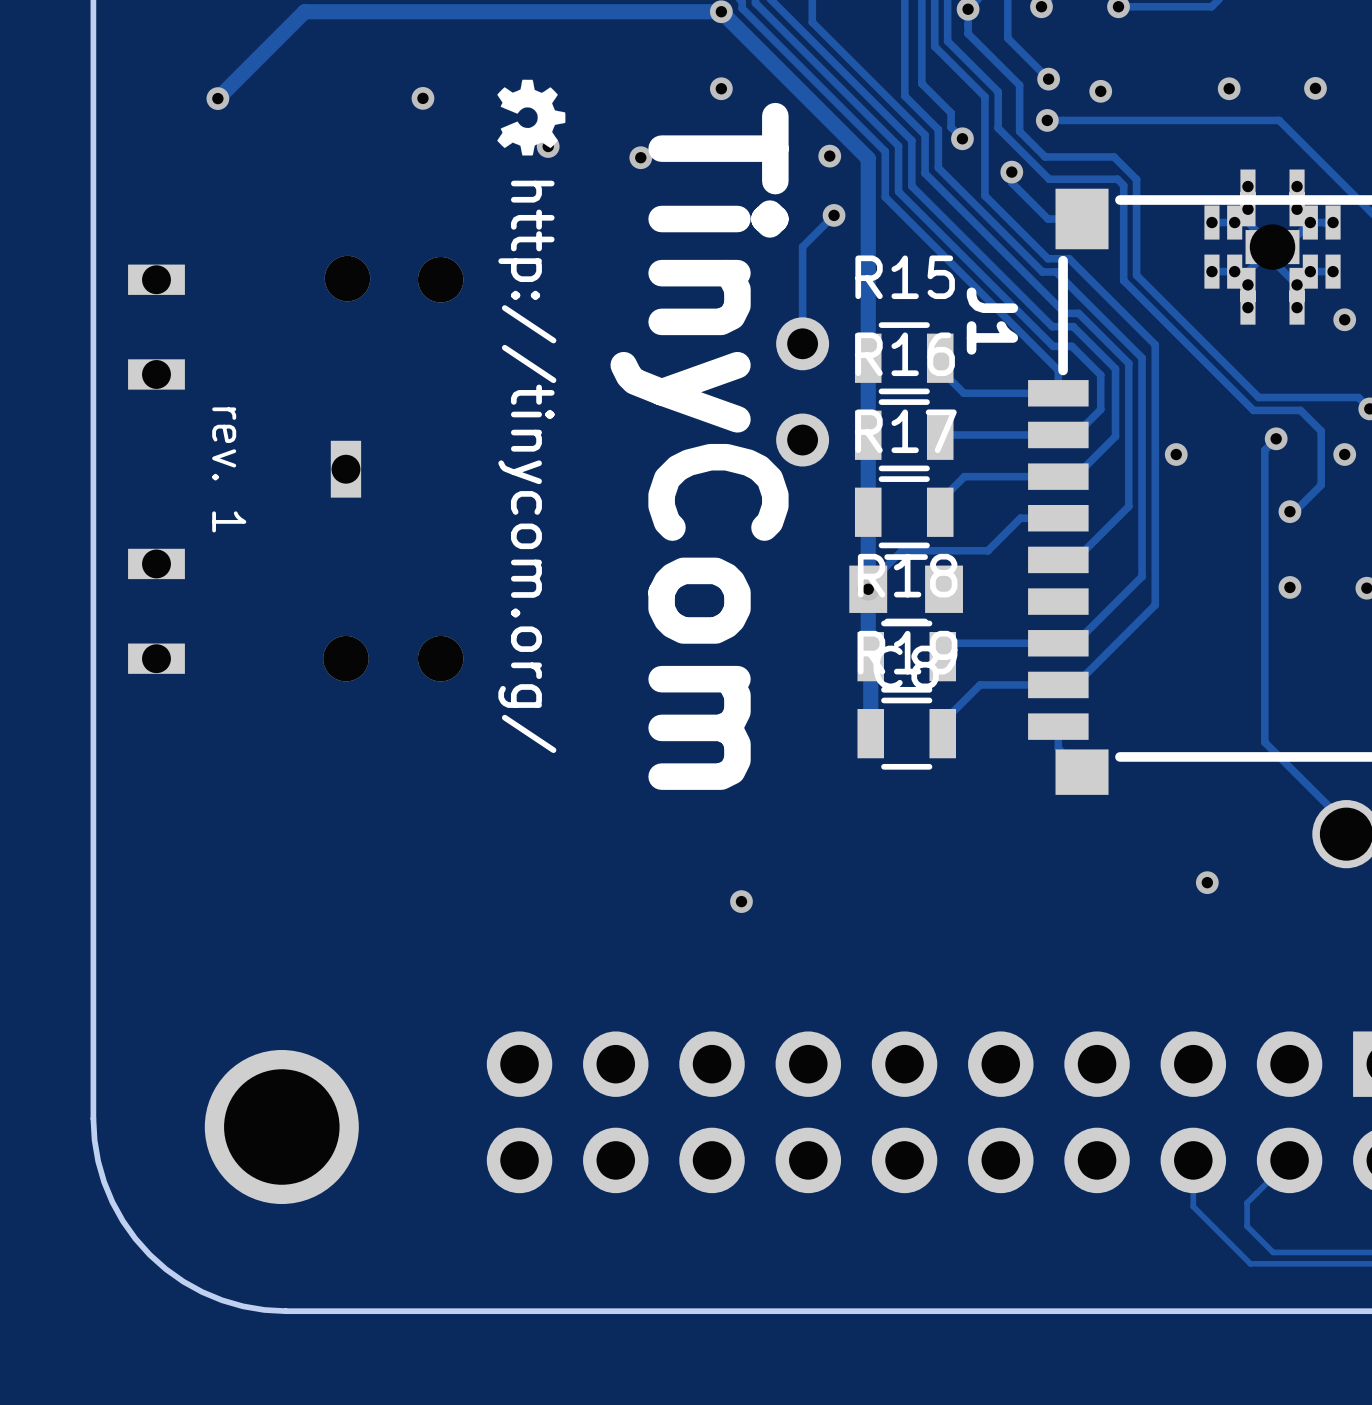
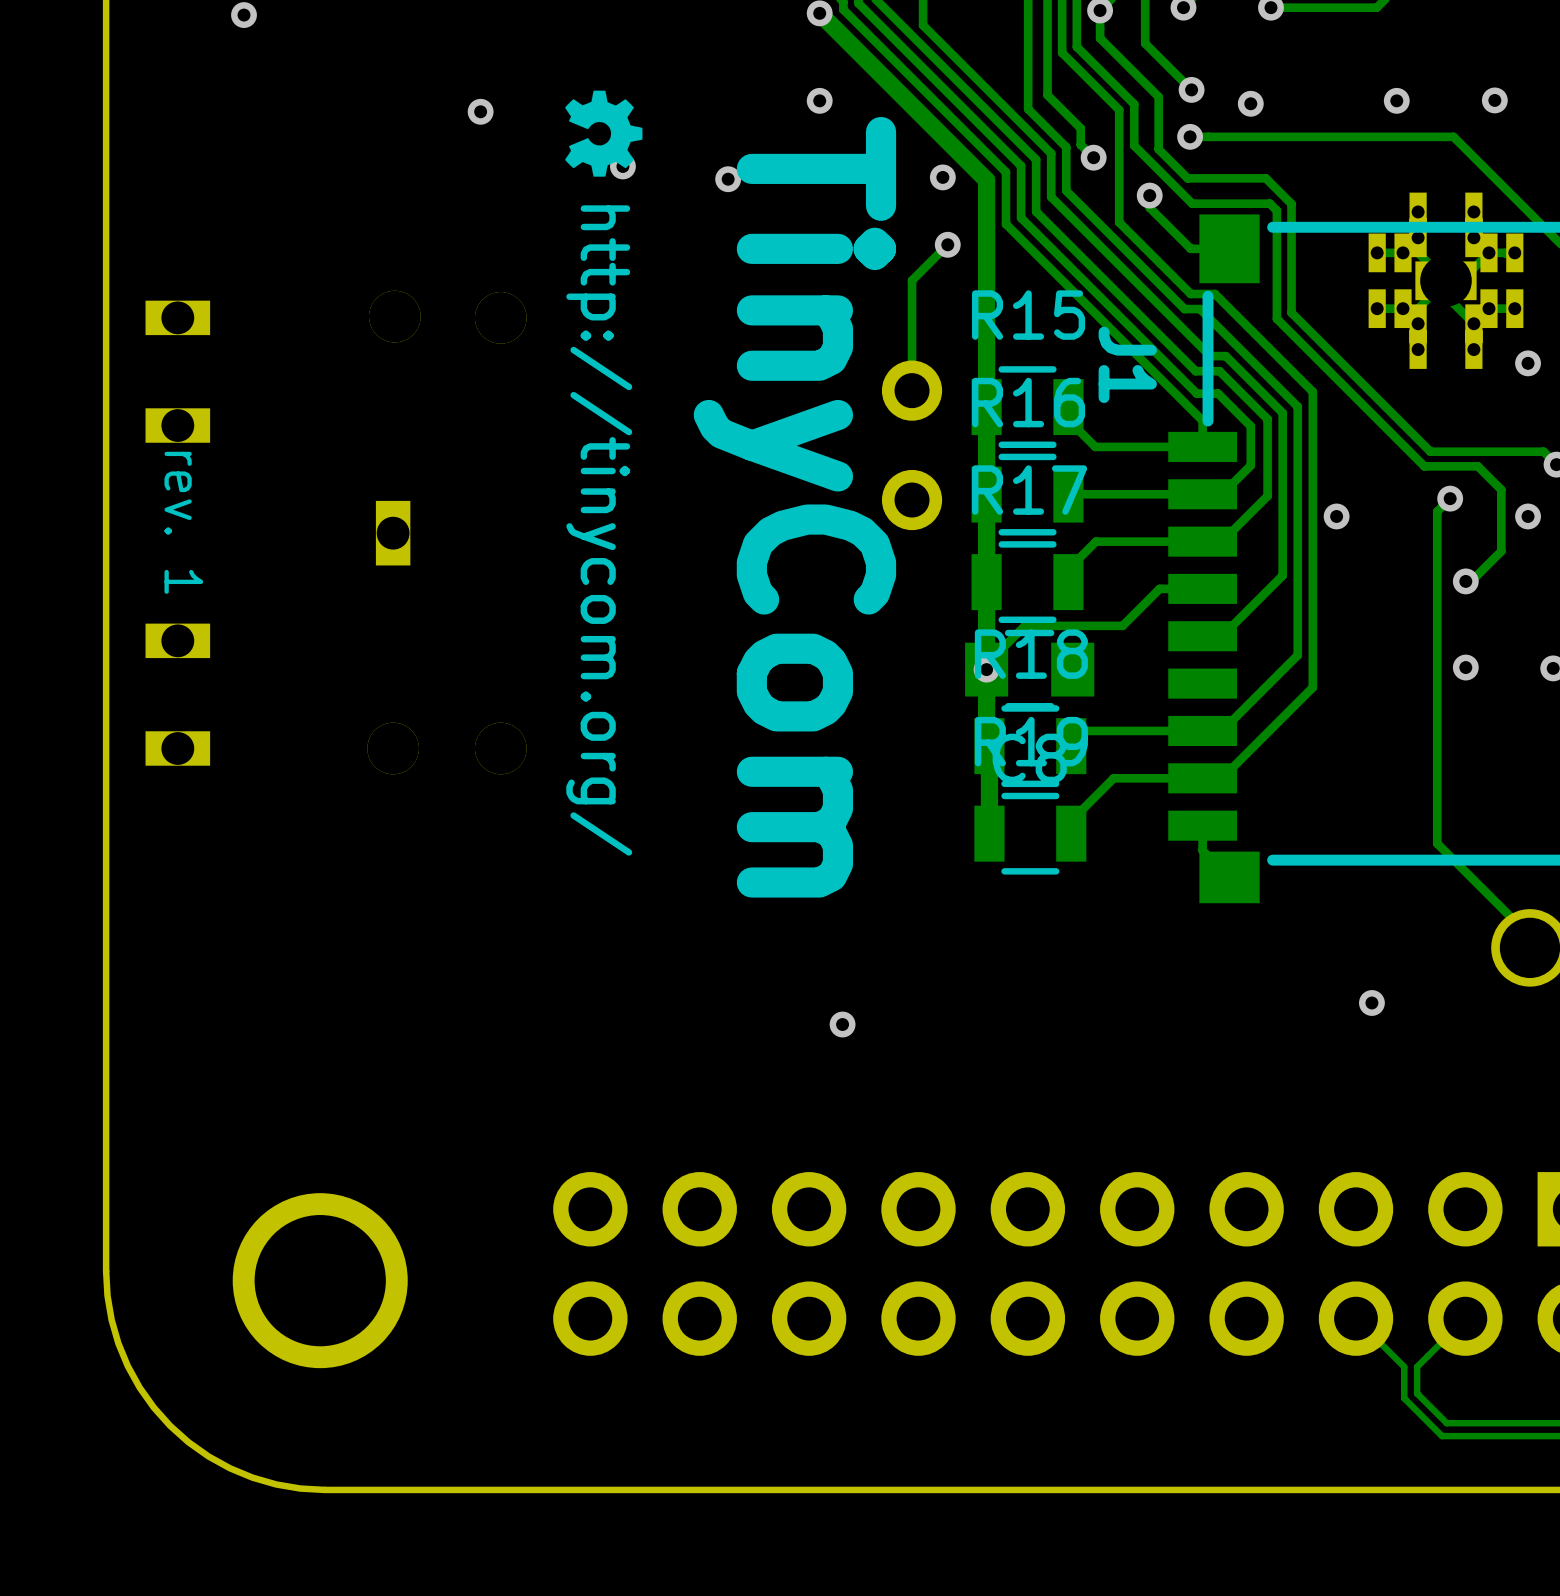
track: (721, 11) (304, 11) (217, 98) -> none
via: none -> (244, 15)
via: (217, 98) -> none
text position: rev. 1 (229, 469) -> rev. 1 (183, 522)
track: (1193, 1160) (1193, 1206) (1250, 1263) (1269, 1263) -> (1356, 1318) (1404, 1366) (1404, 1398) (1442, 1436)

